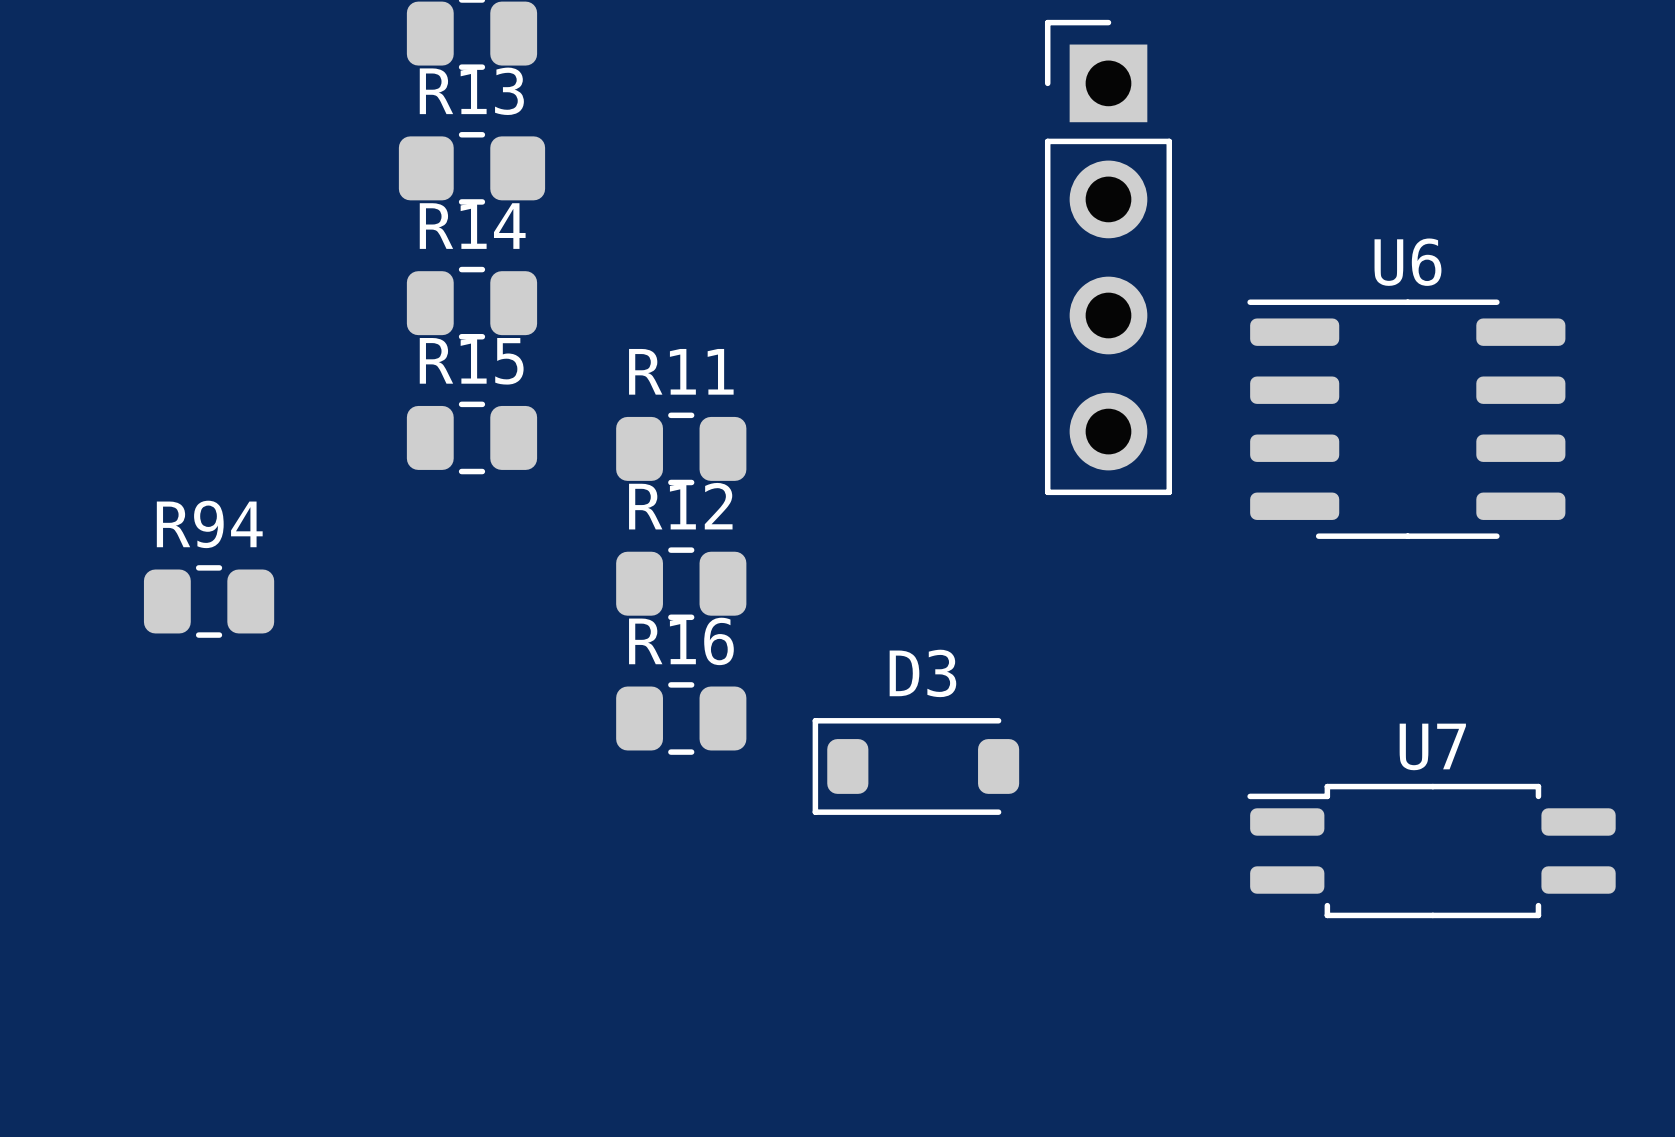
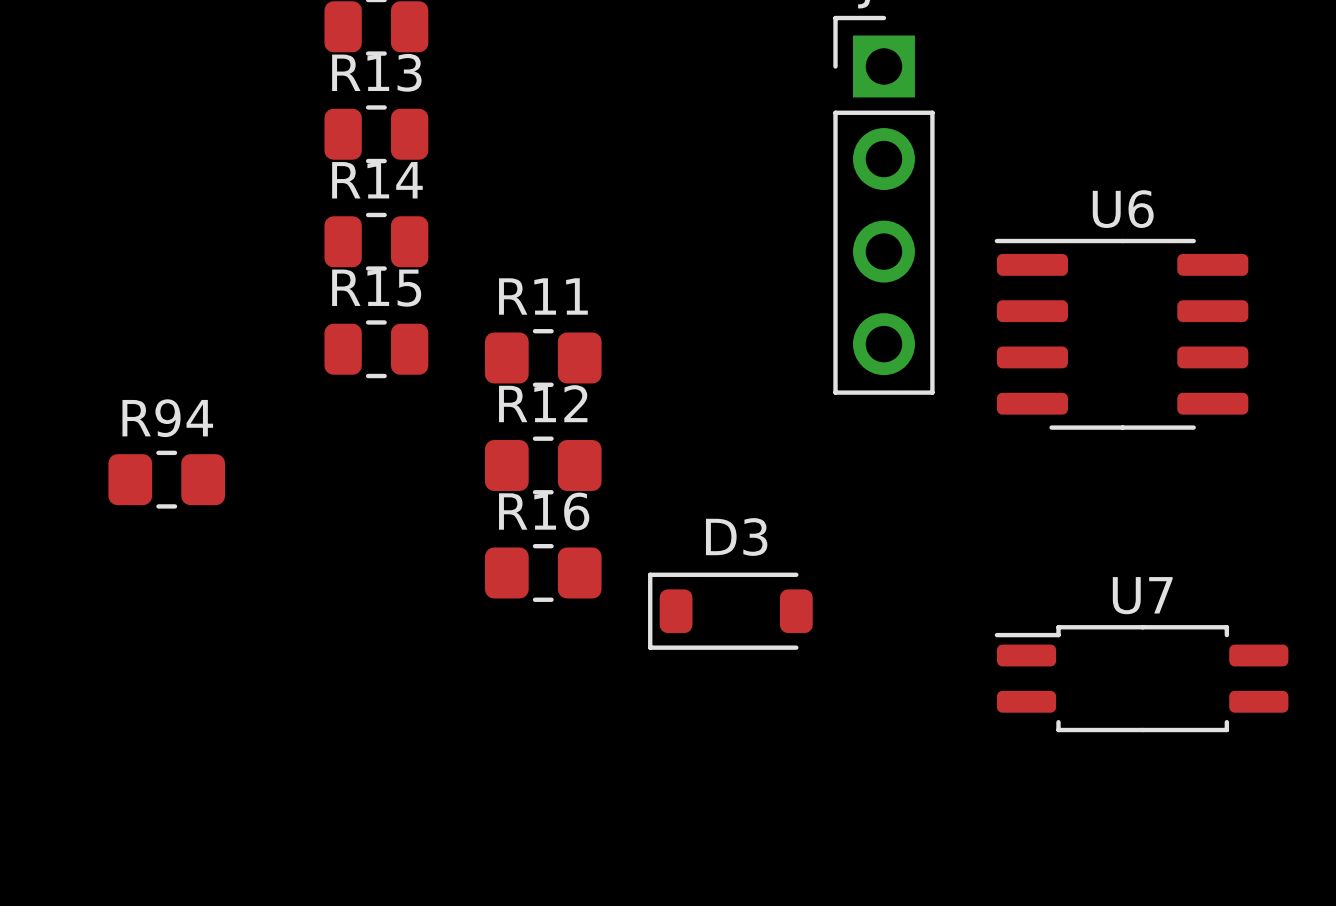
R13 footprint: [398, 132, 546, 205] -> [324, 105, 429, 164]
R11 footprint: [616, 412, 747, 486] -> [484, 329, 602, 387]
R12 footprint: [616, 547, 747, 621] -> [484, 436, 602, 495]
R94 footprint: [143, 565, 275, 638] -> [108, 450, 226, 509]
R16 footprint: [616, 682, 747, 755] -> [484, 544, 602, 602]

